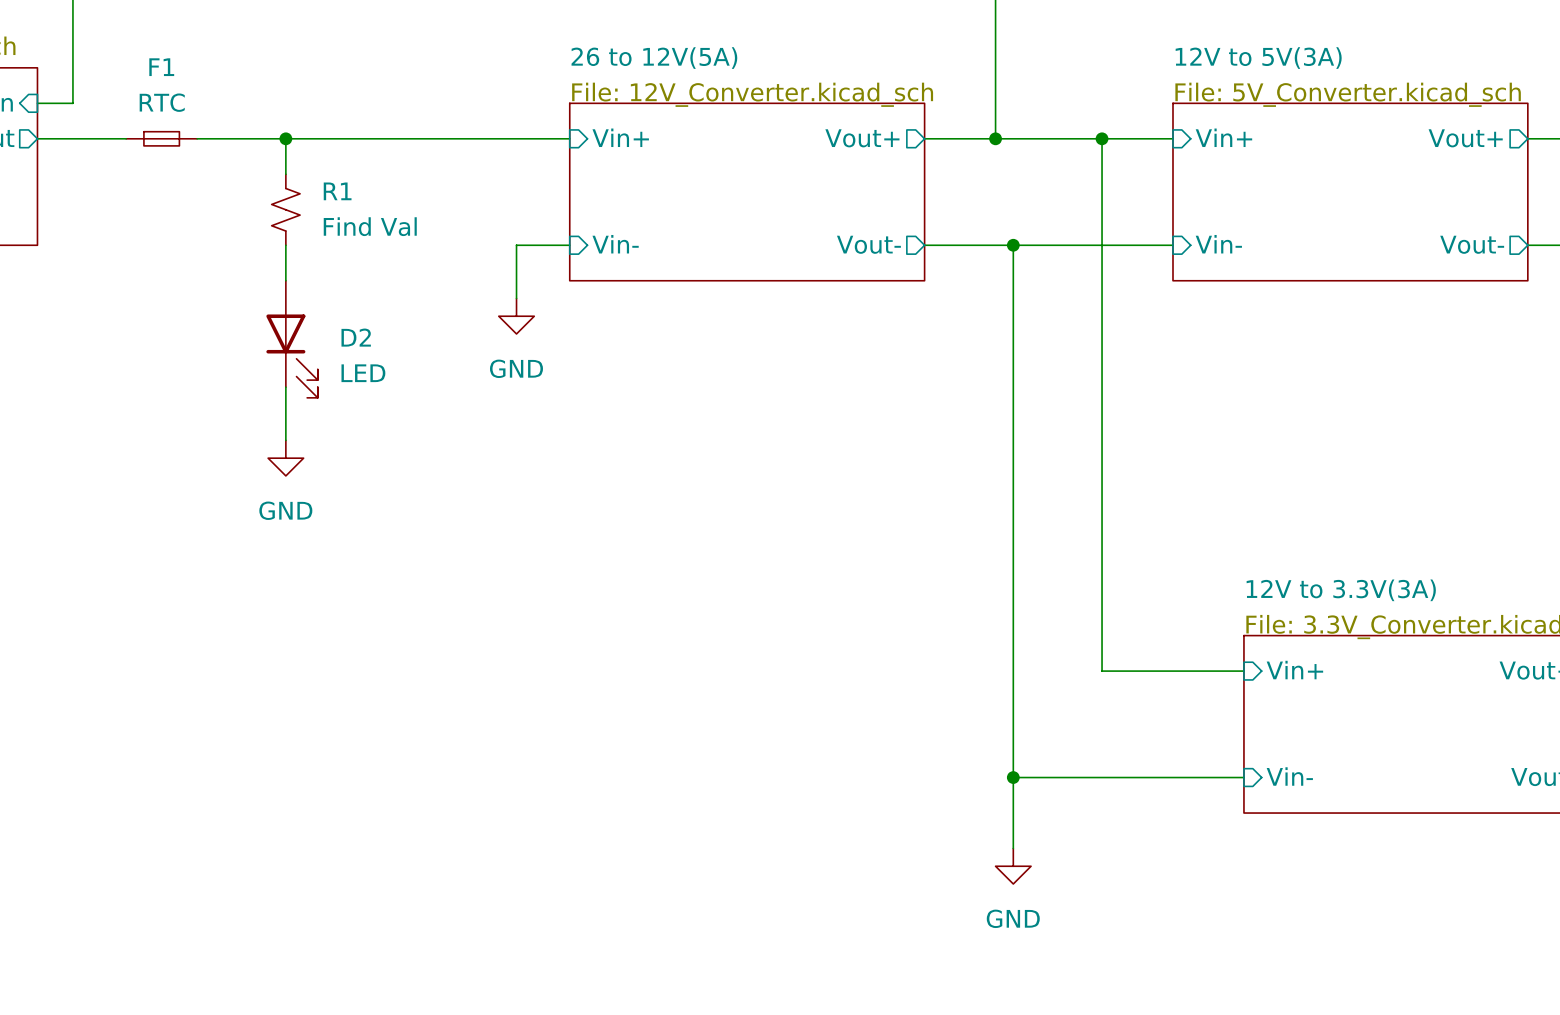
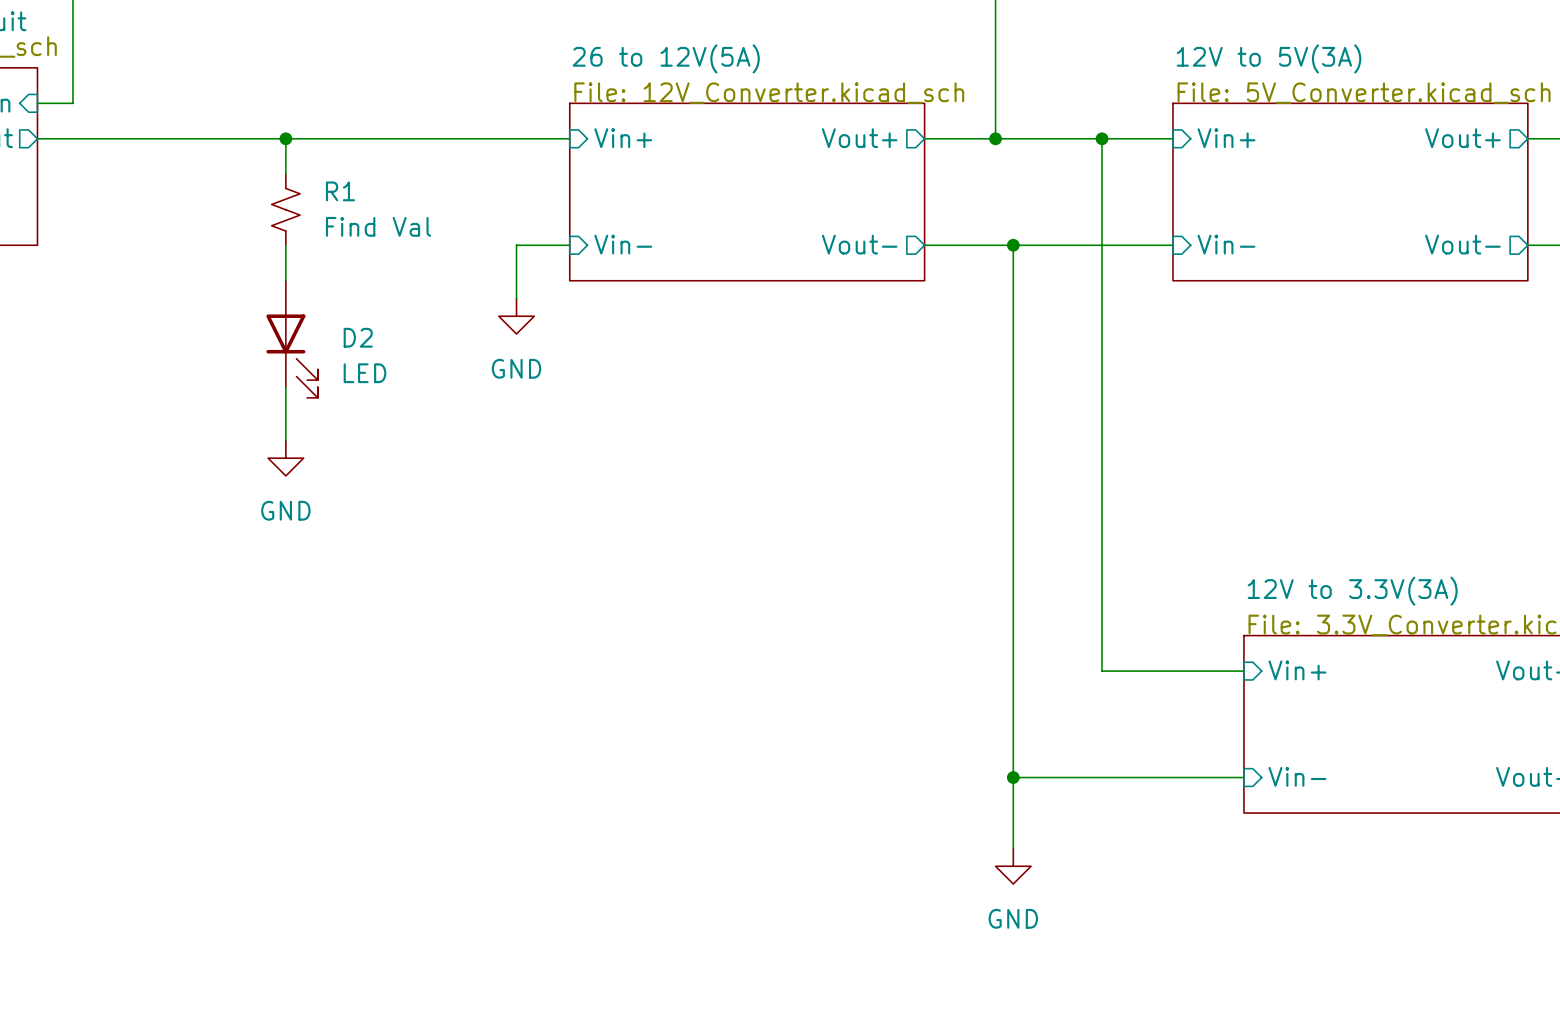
F1: RTC (161, 138) -> none

